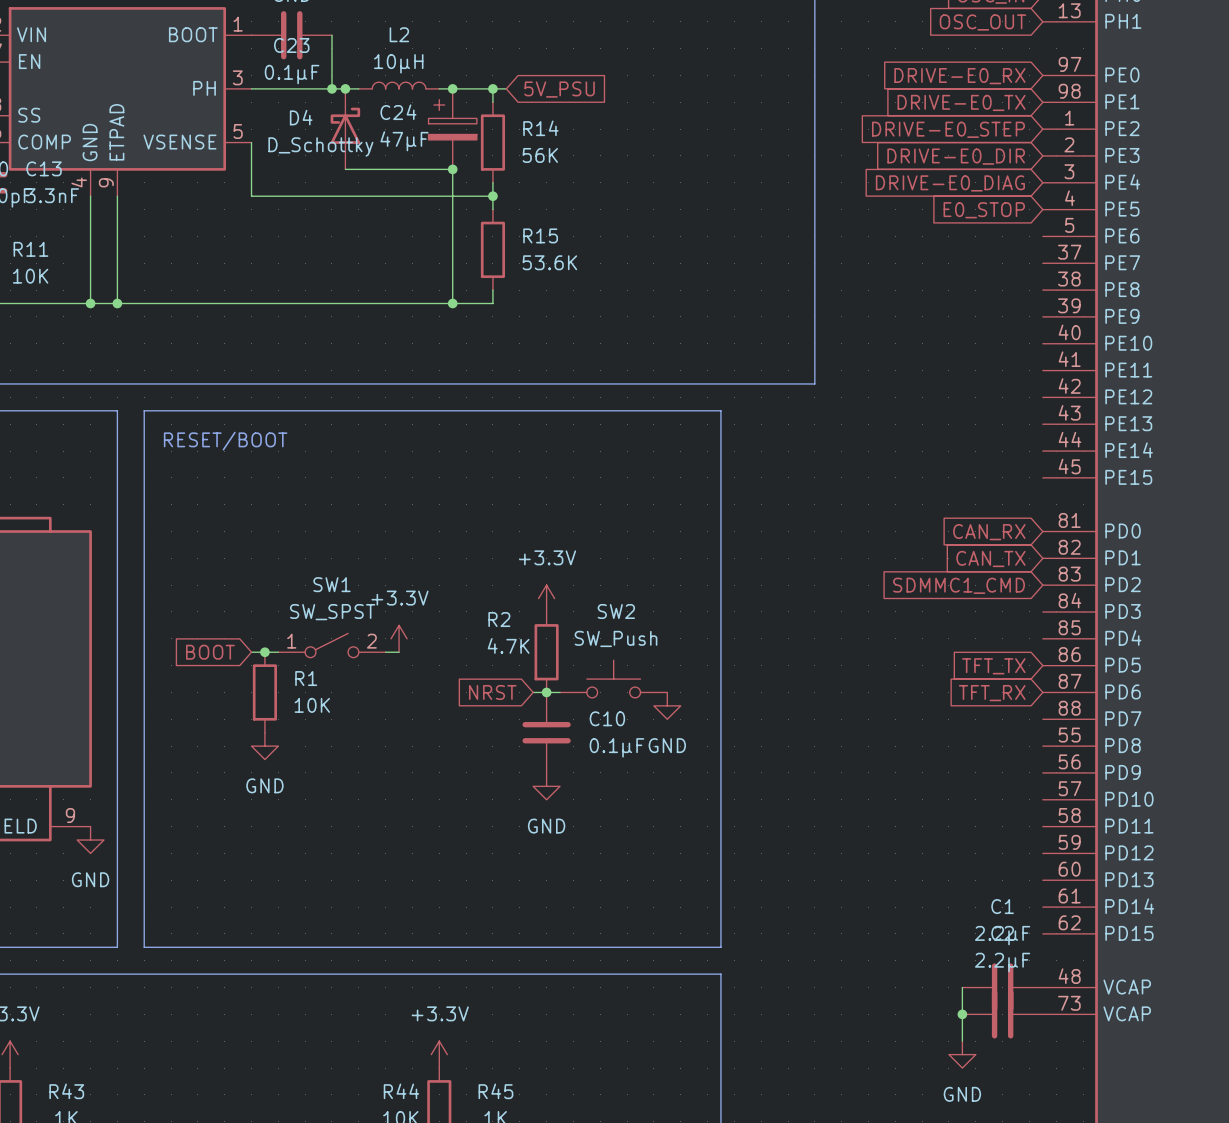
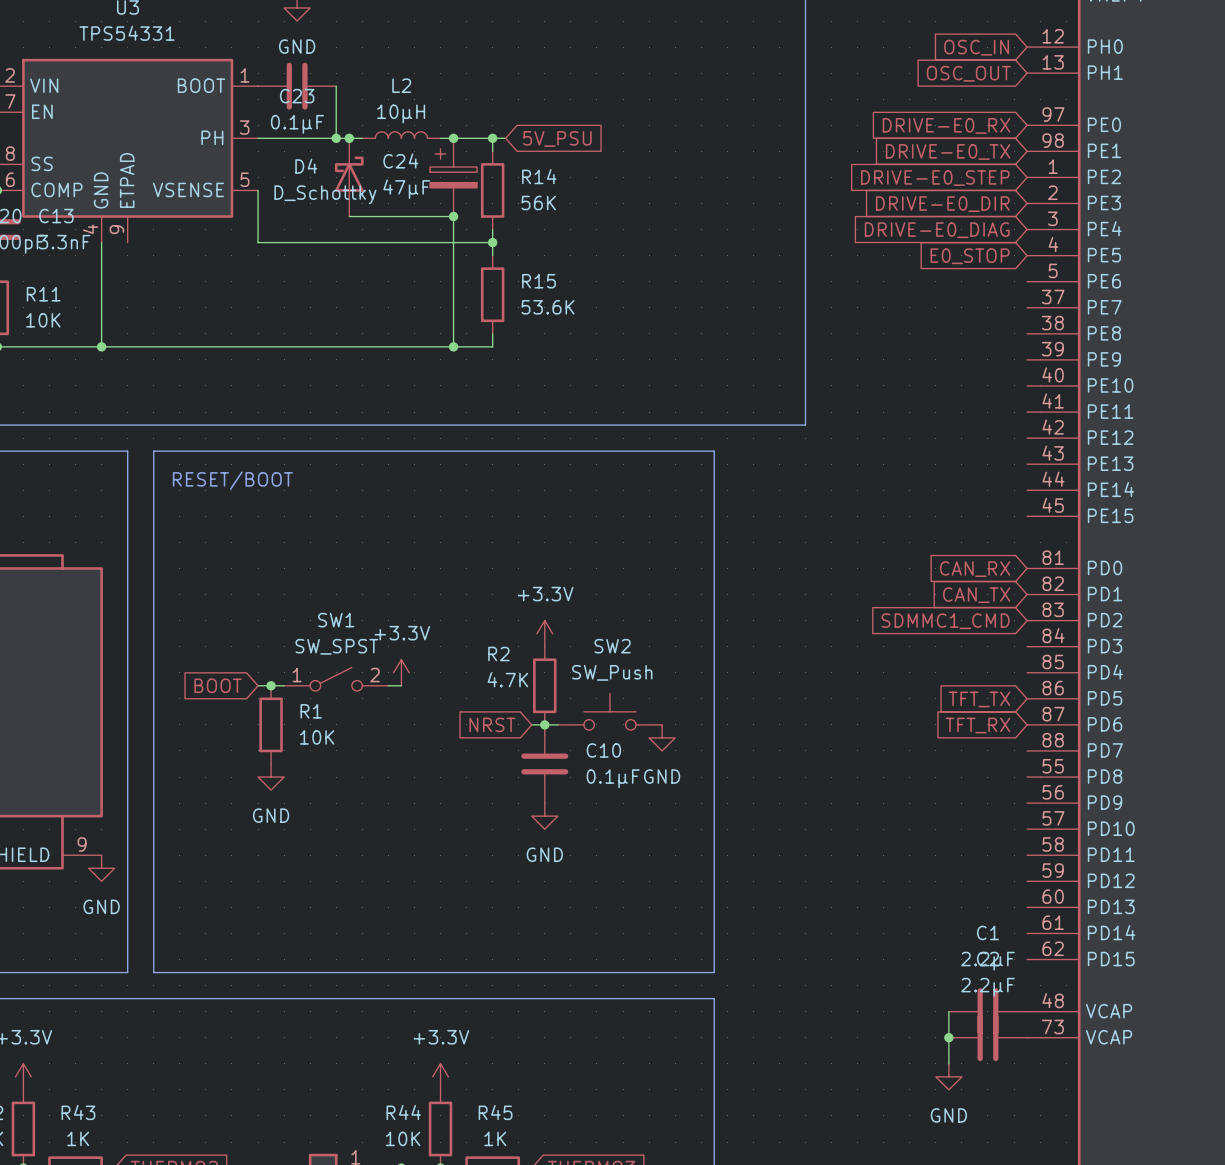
wire: (117, 196) (117, 303) -> none
junction: (117, 303) -> none

